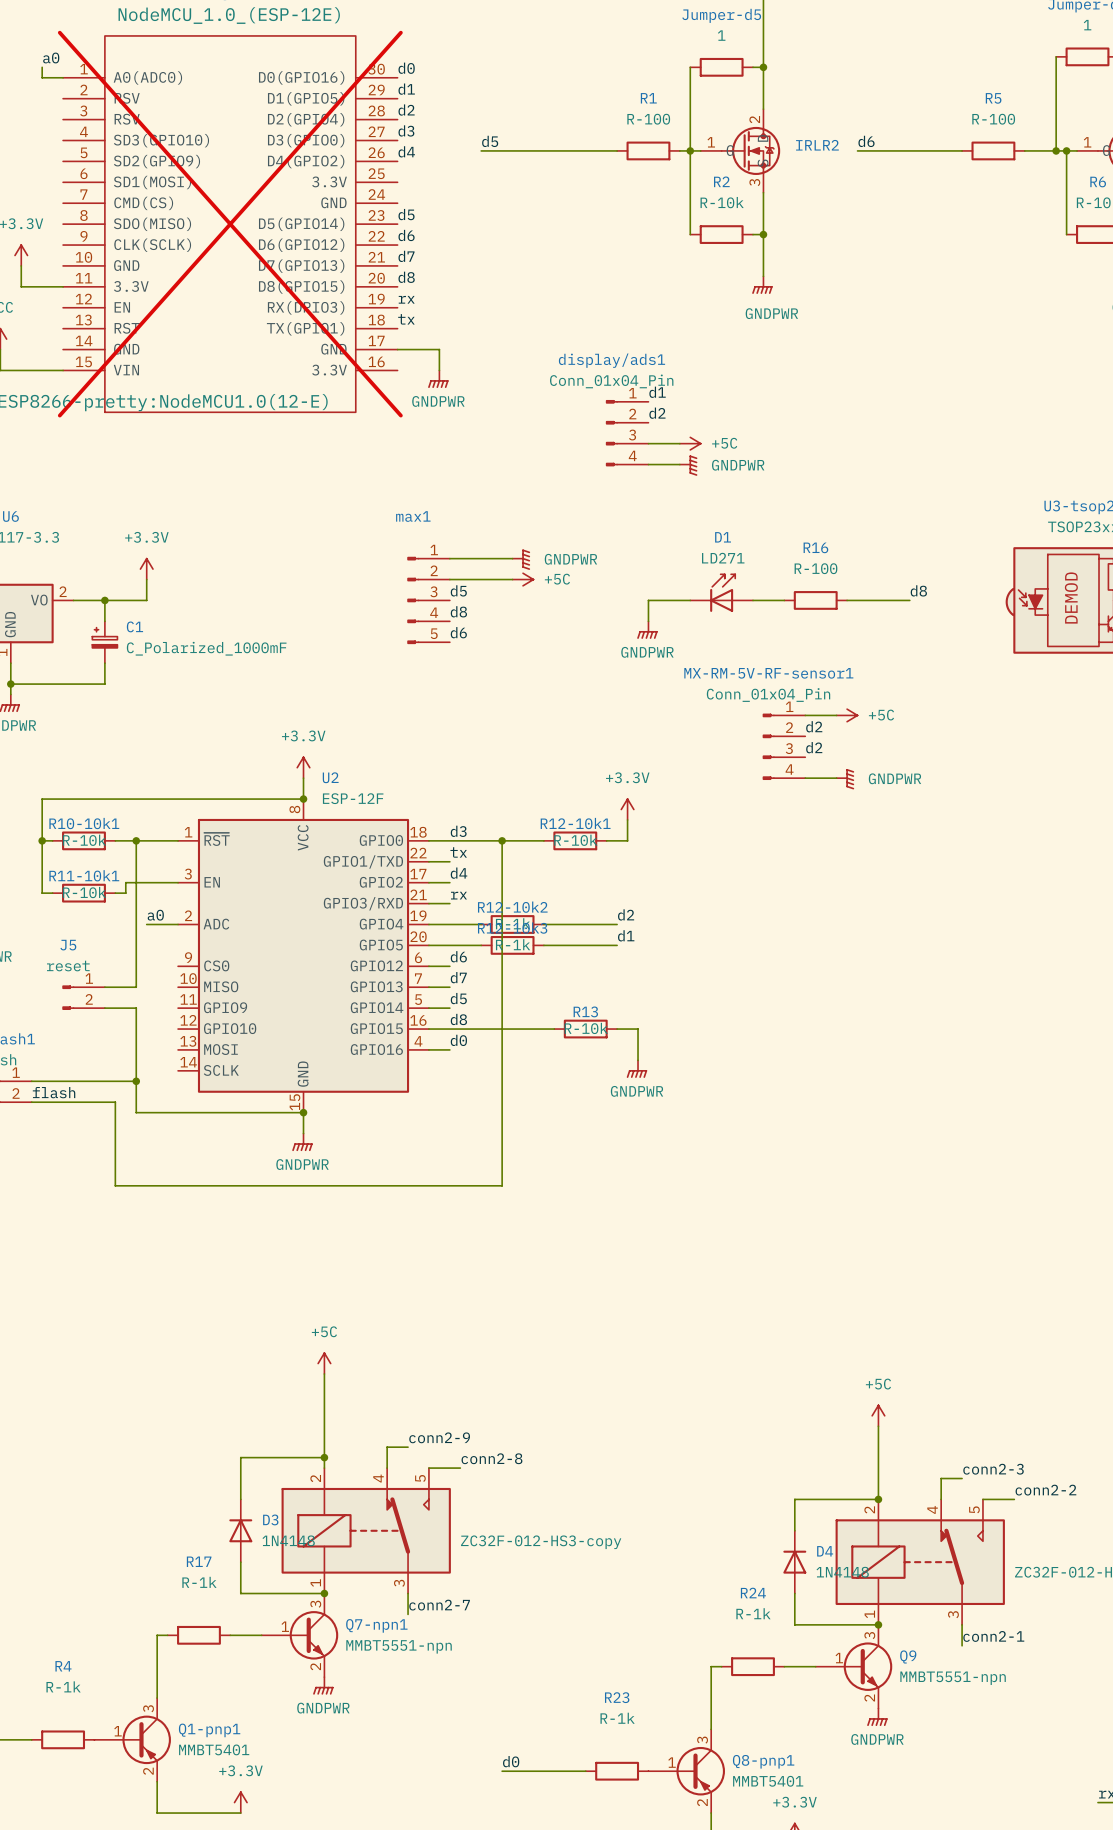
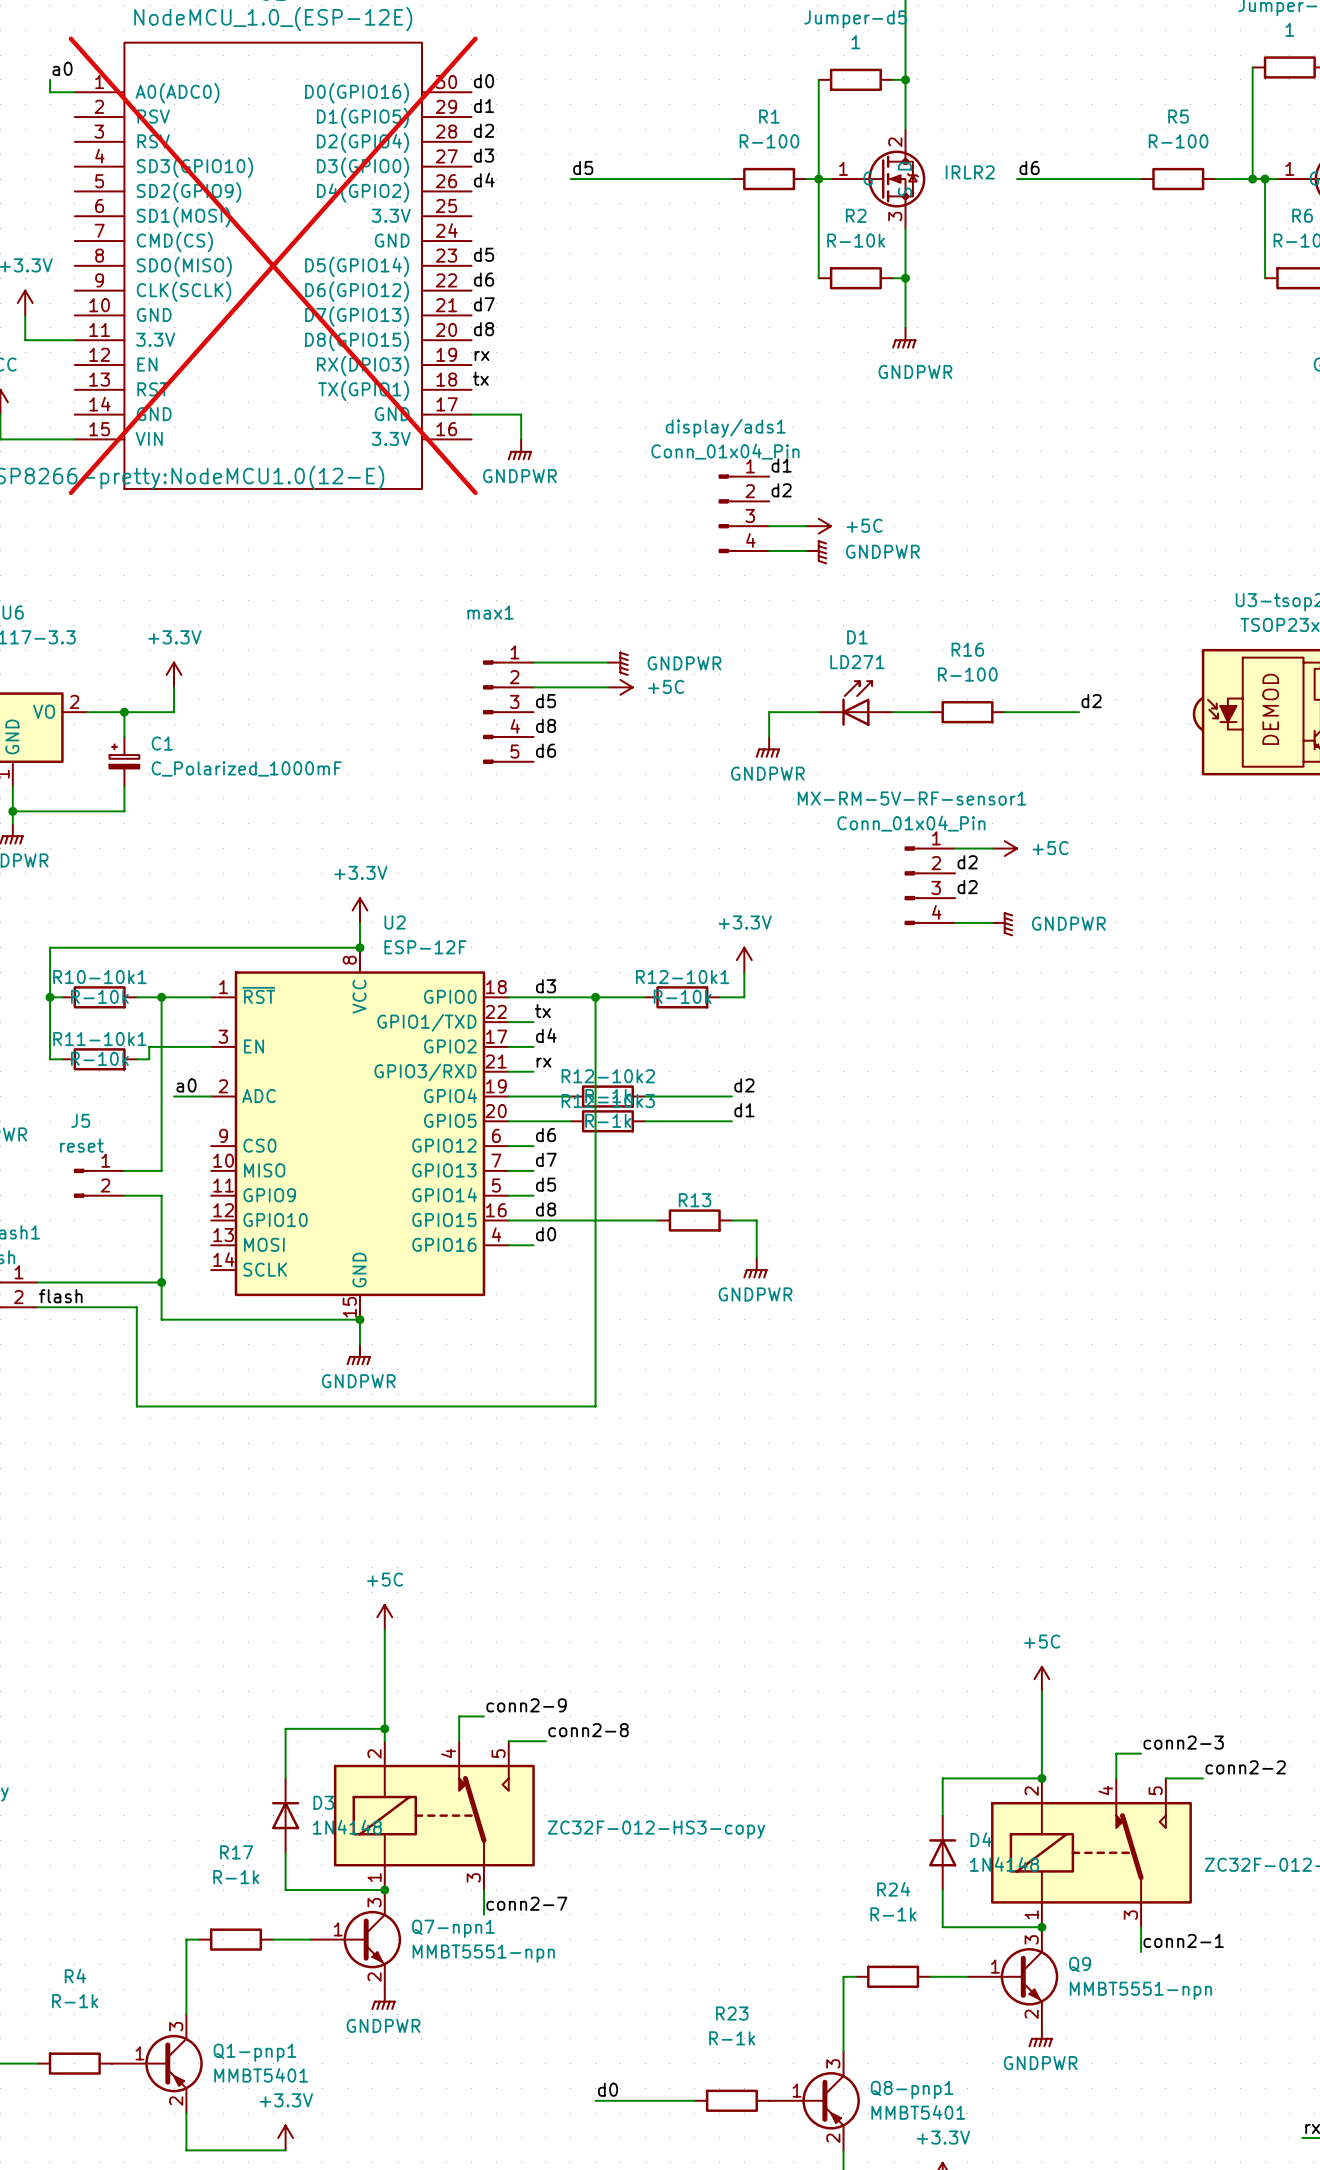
label: d8 (918, 590) -> d2 (1091, 701)
R13 value: R-10k (586, 1028) -> none

